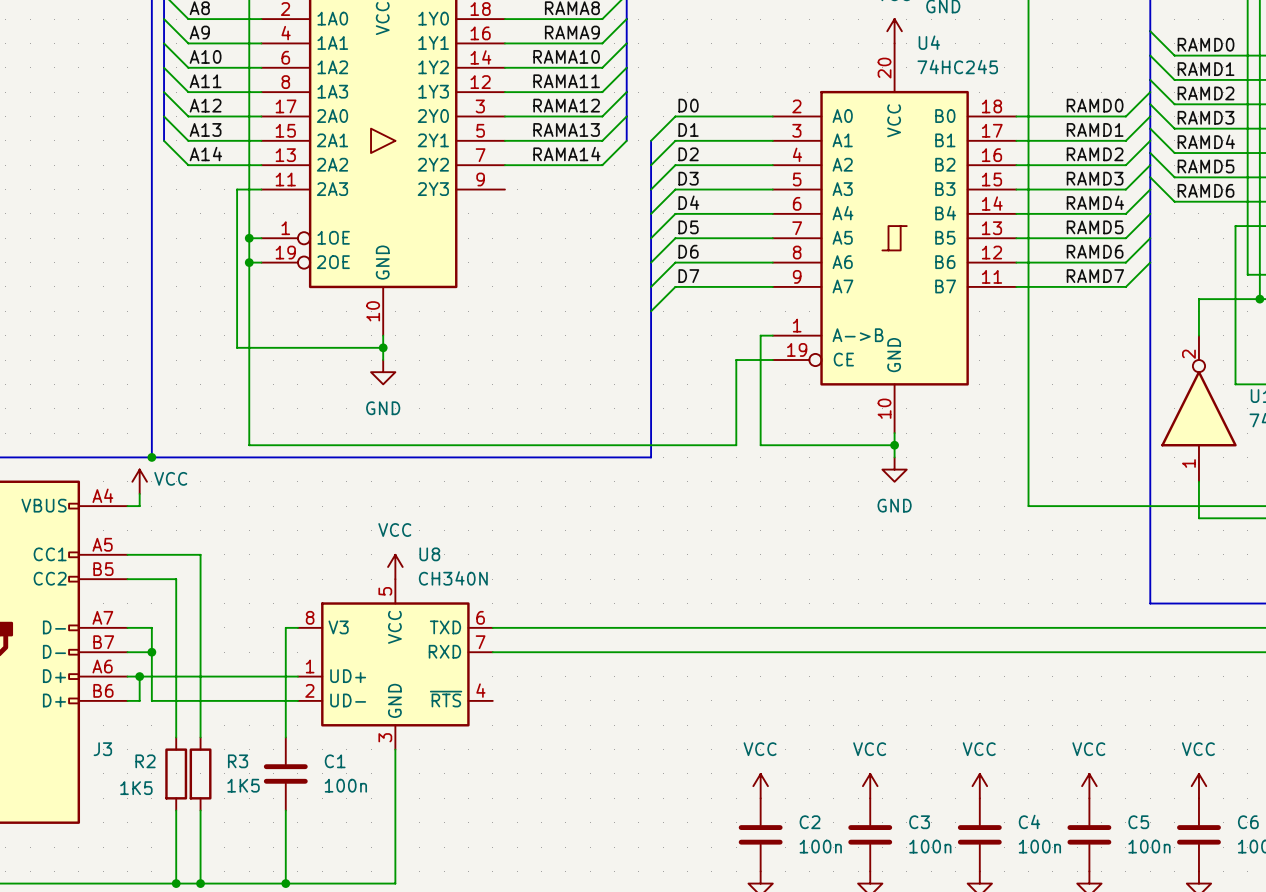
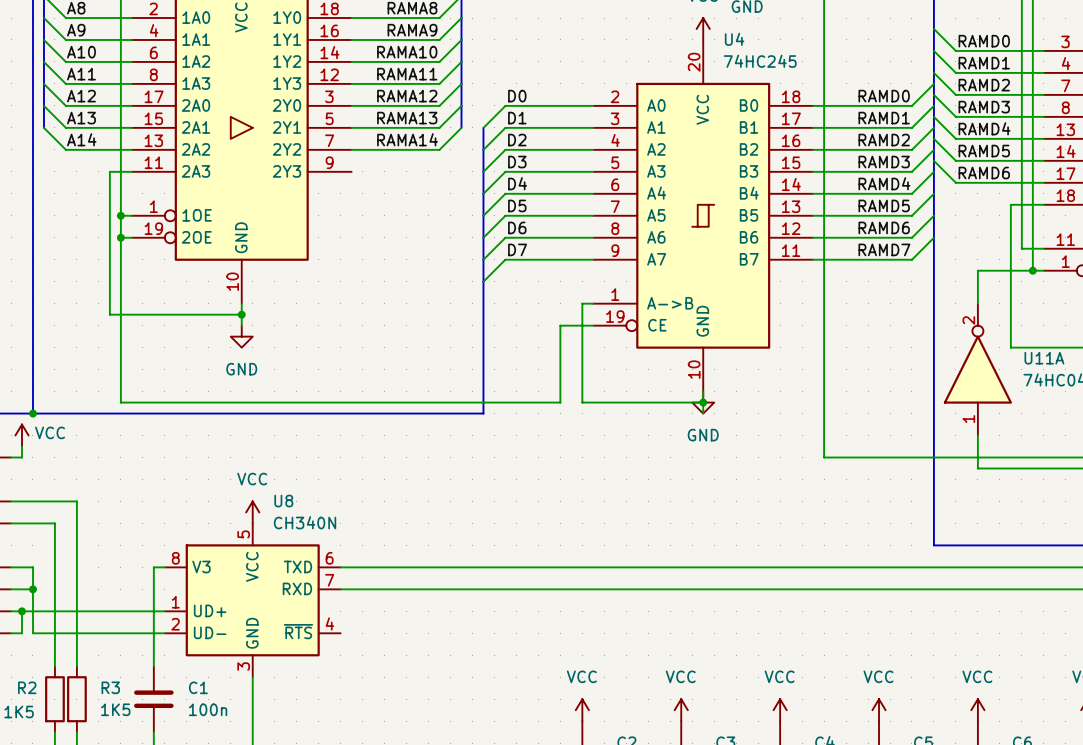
power symbol position: GND (894, 469) -> GND (703, 402)

